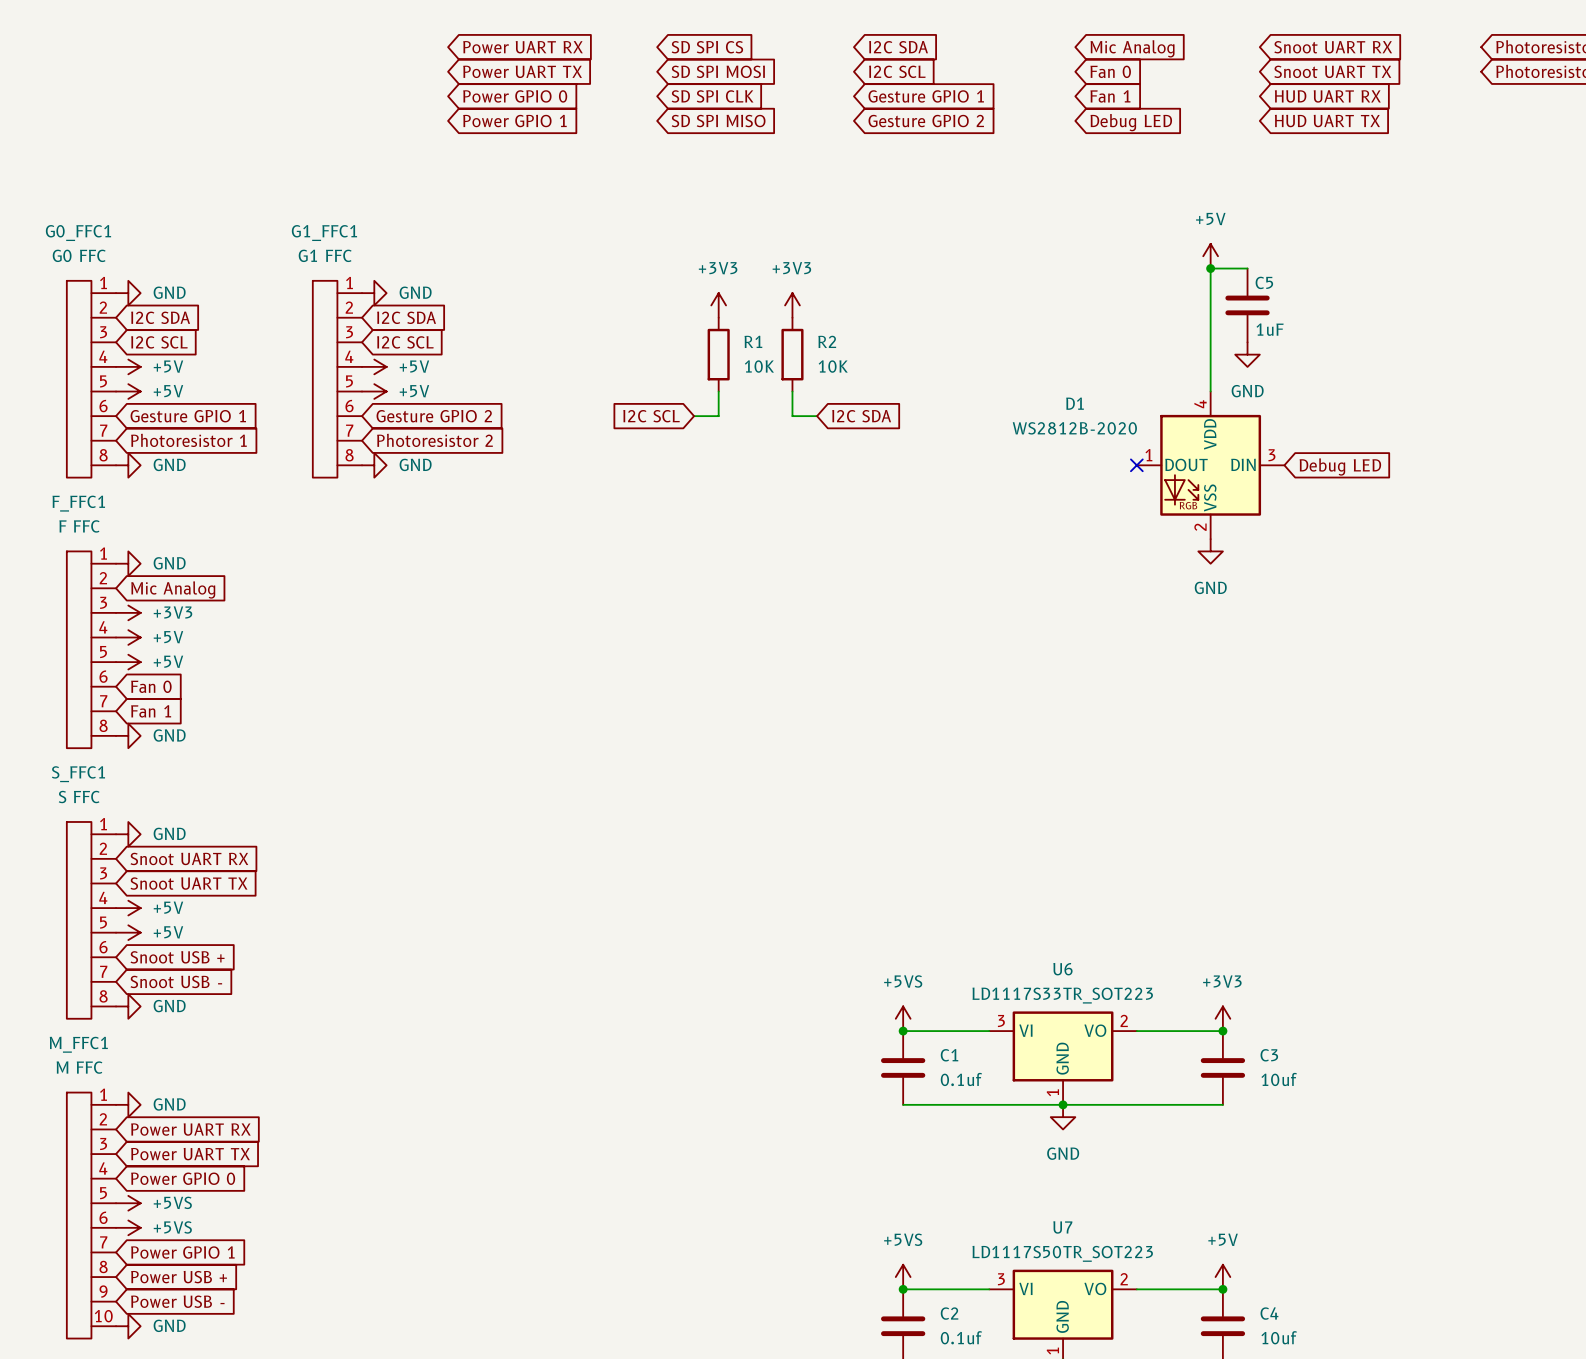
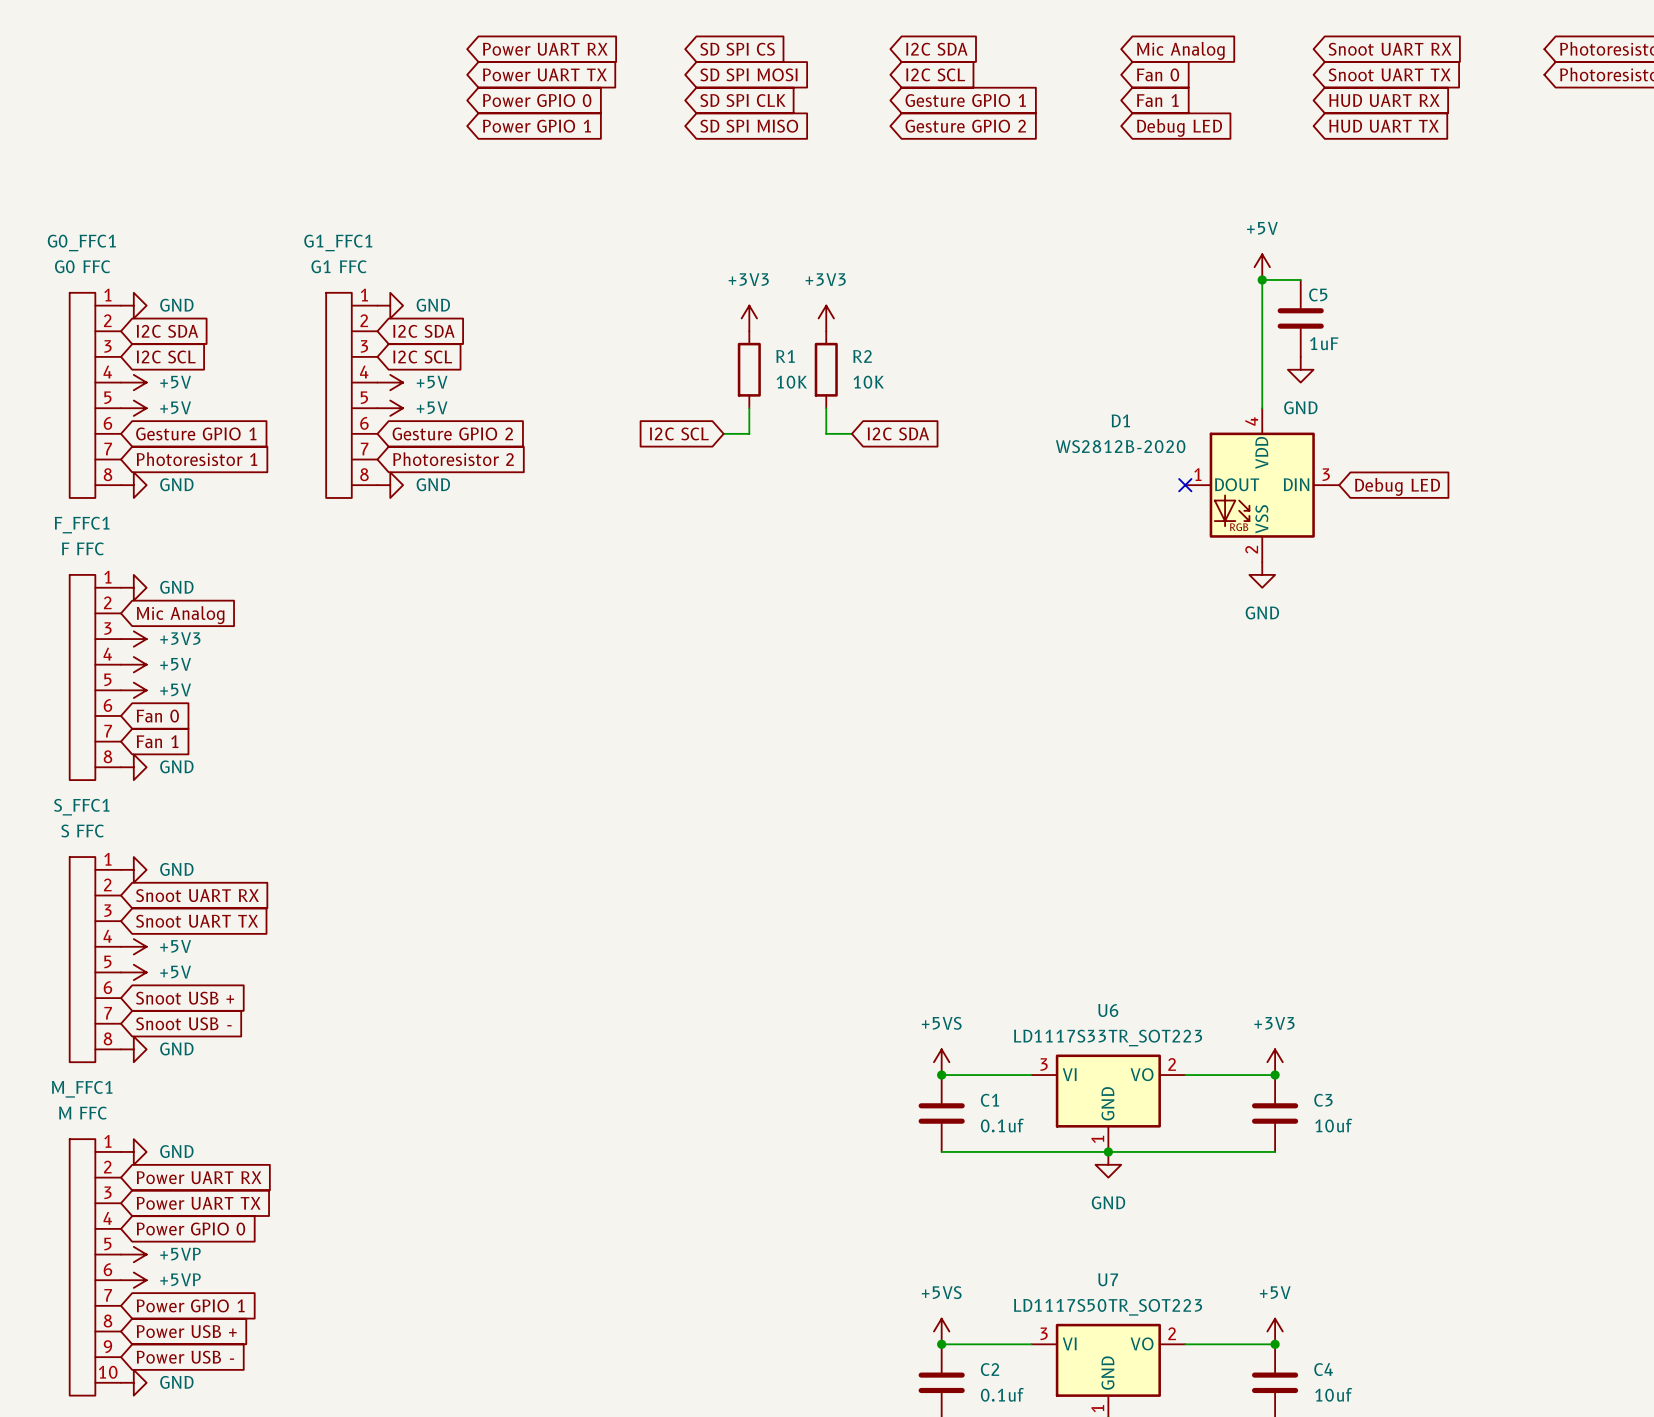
power symbol: +5VS (128, 1203) -> +5VP (133, 1254)
power symbol: +5VS (128, 1227) -> +5VP (133, 1280)

